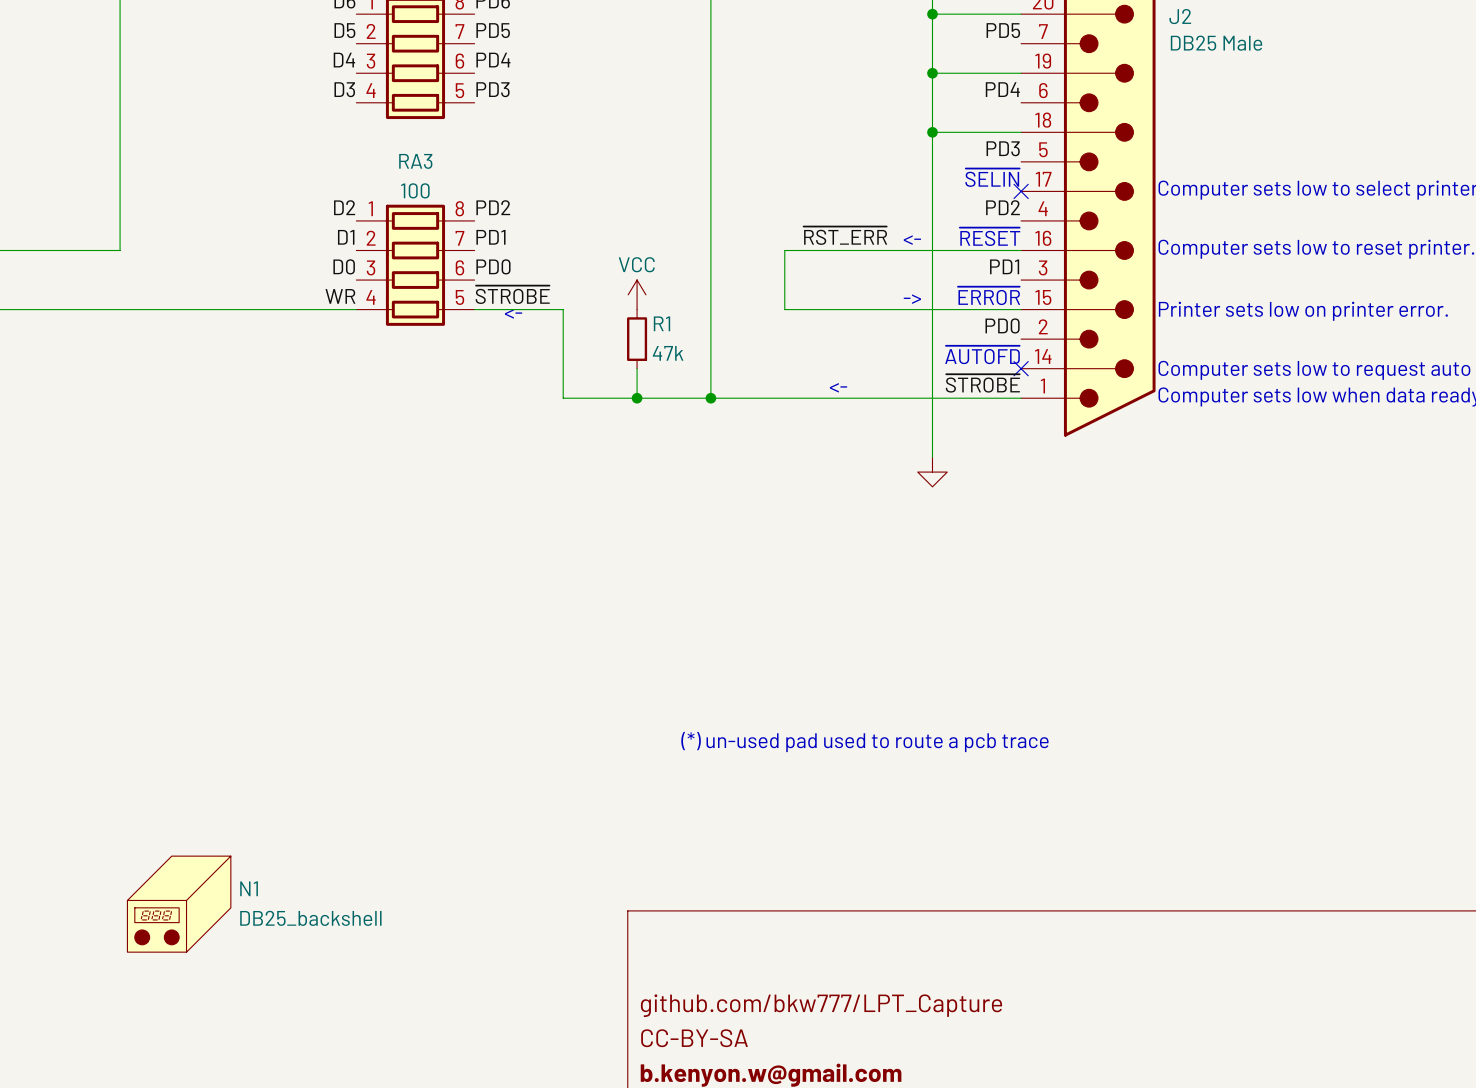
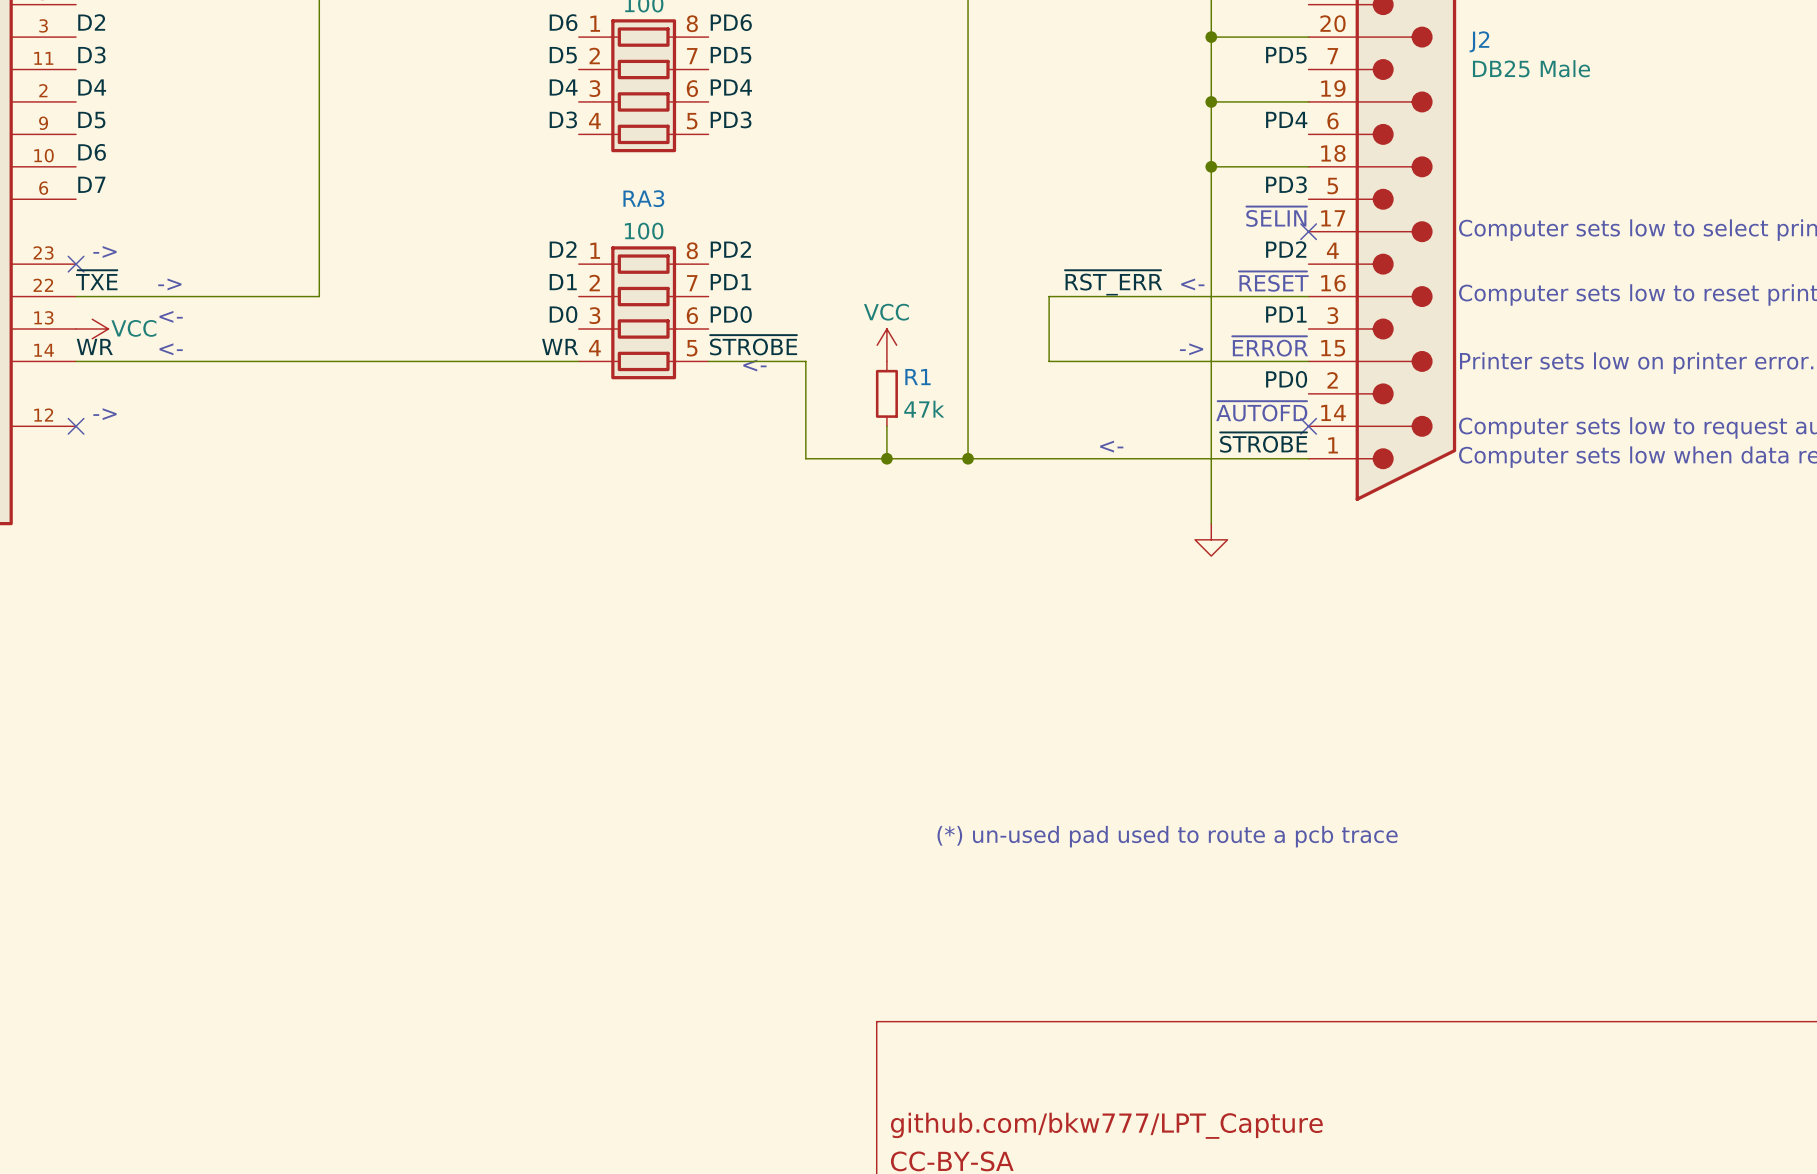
N1: DB25_backshell (179, 904) -> none

